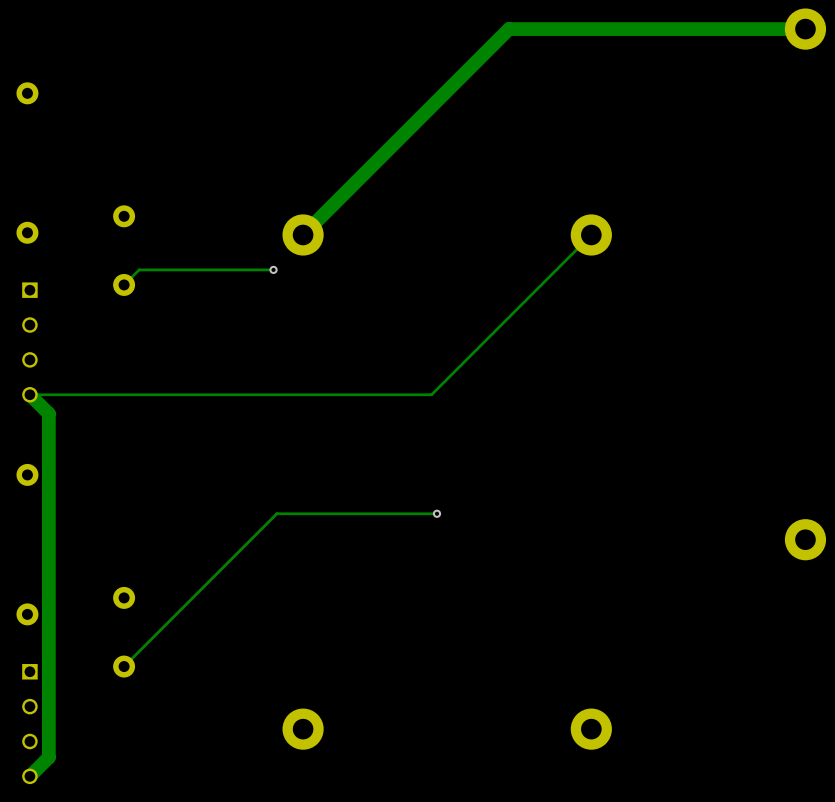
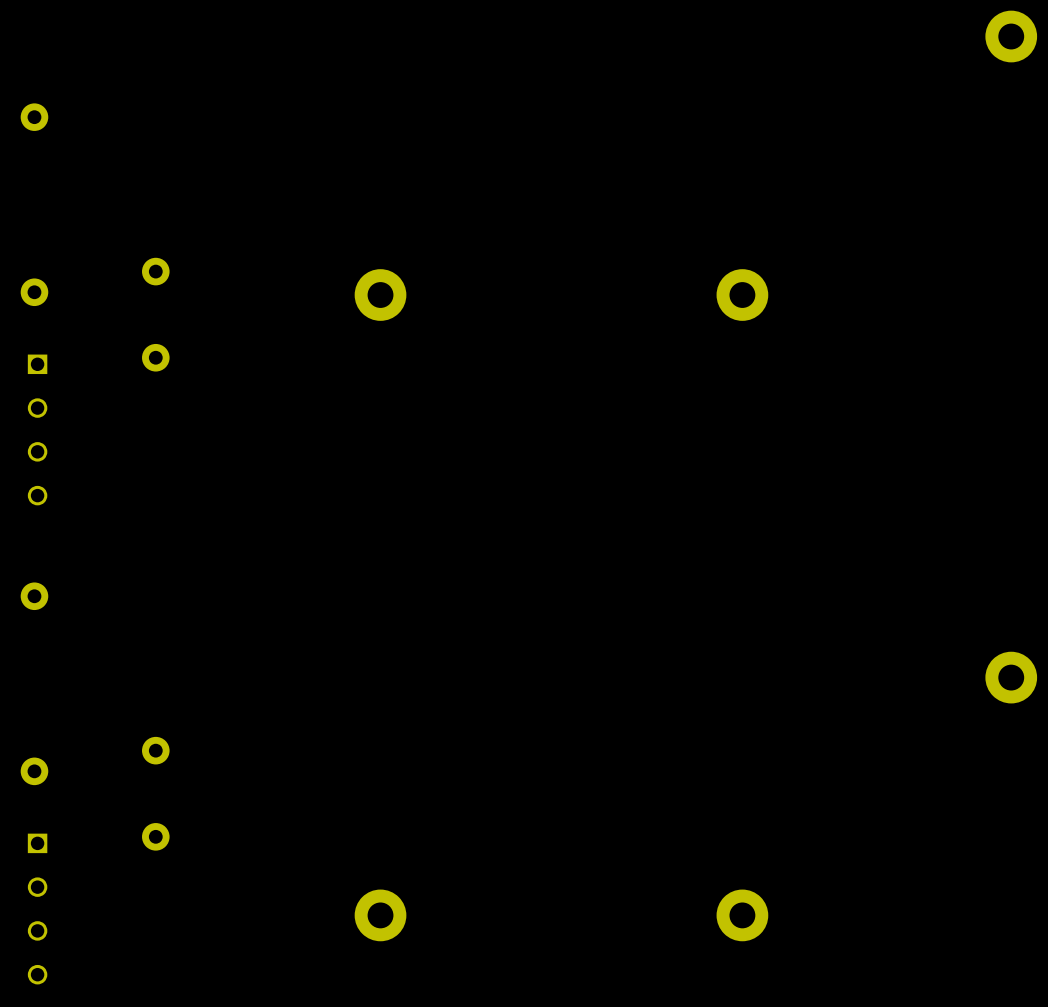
track: (805, 29) (508, 29) (303, 234) -> none
track: (591, 234) (431, 394) (29, 394) (48, 413) (48, 757) (29, 776) -> none
track: (273, 269) (139, 269) (124, 284) -> none
via: (273, 269) -> none
track: (437, 513) (276, 513) (124, 666) -> none
via: (437, 513) -> none

